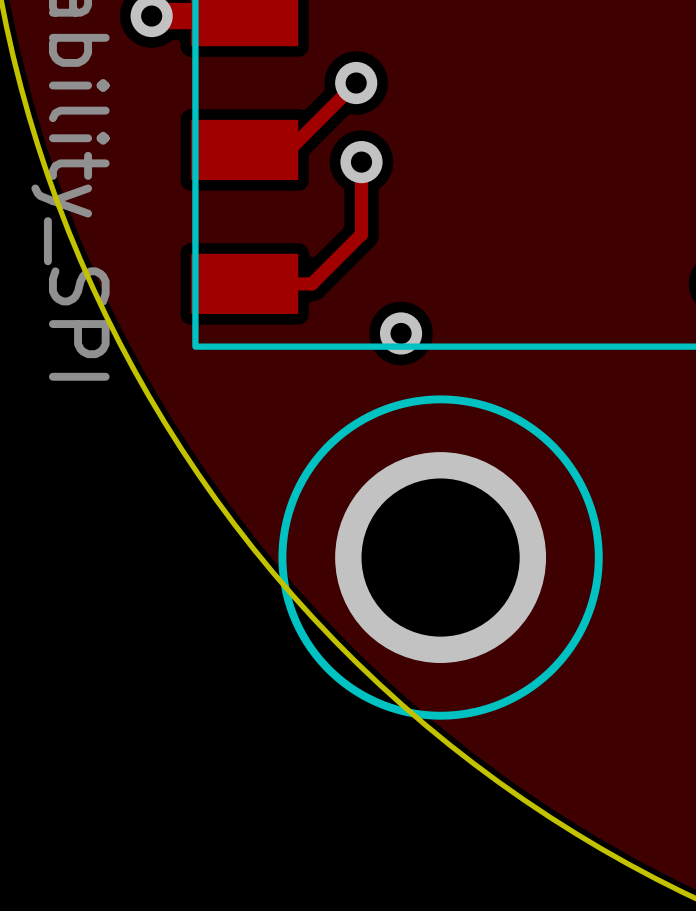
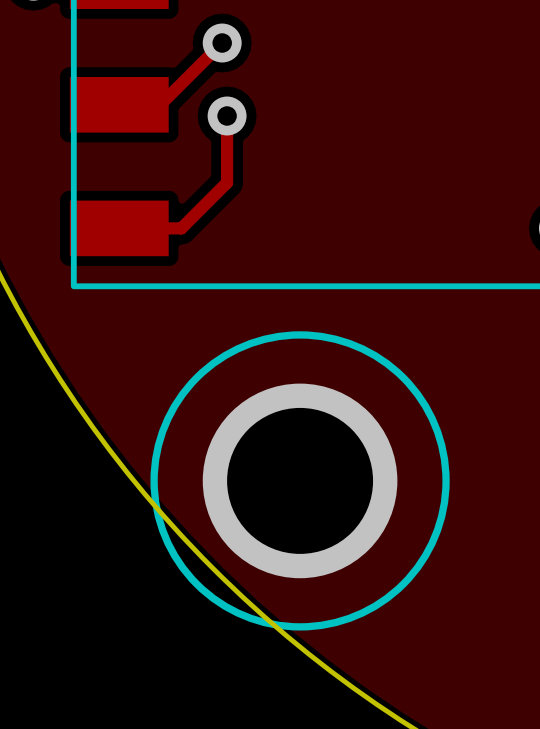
via: (401, 333) -> none

